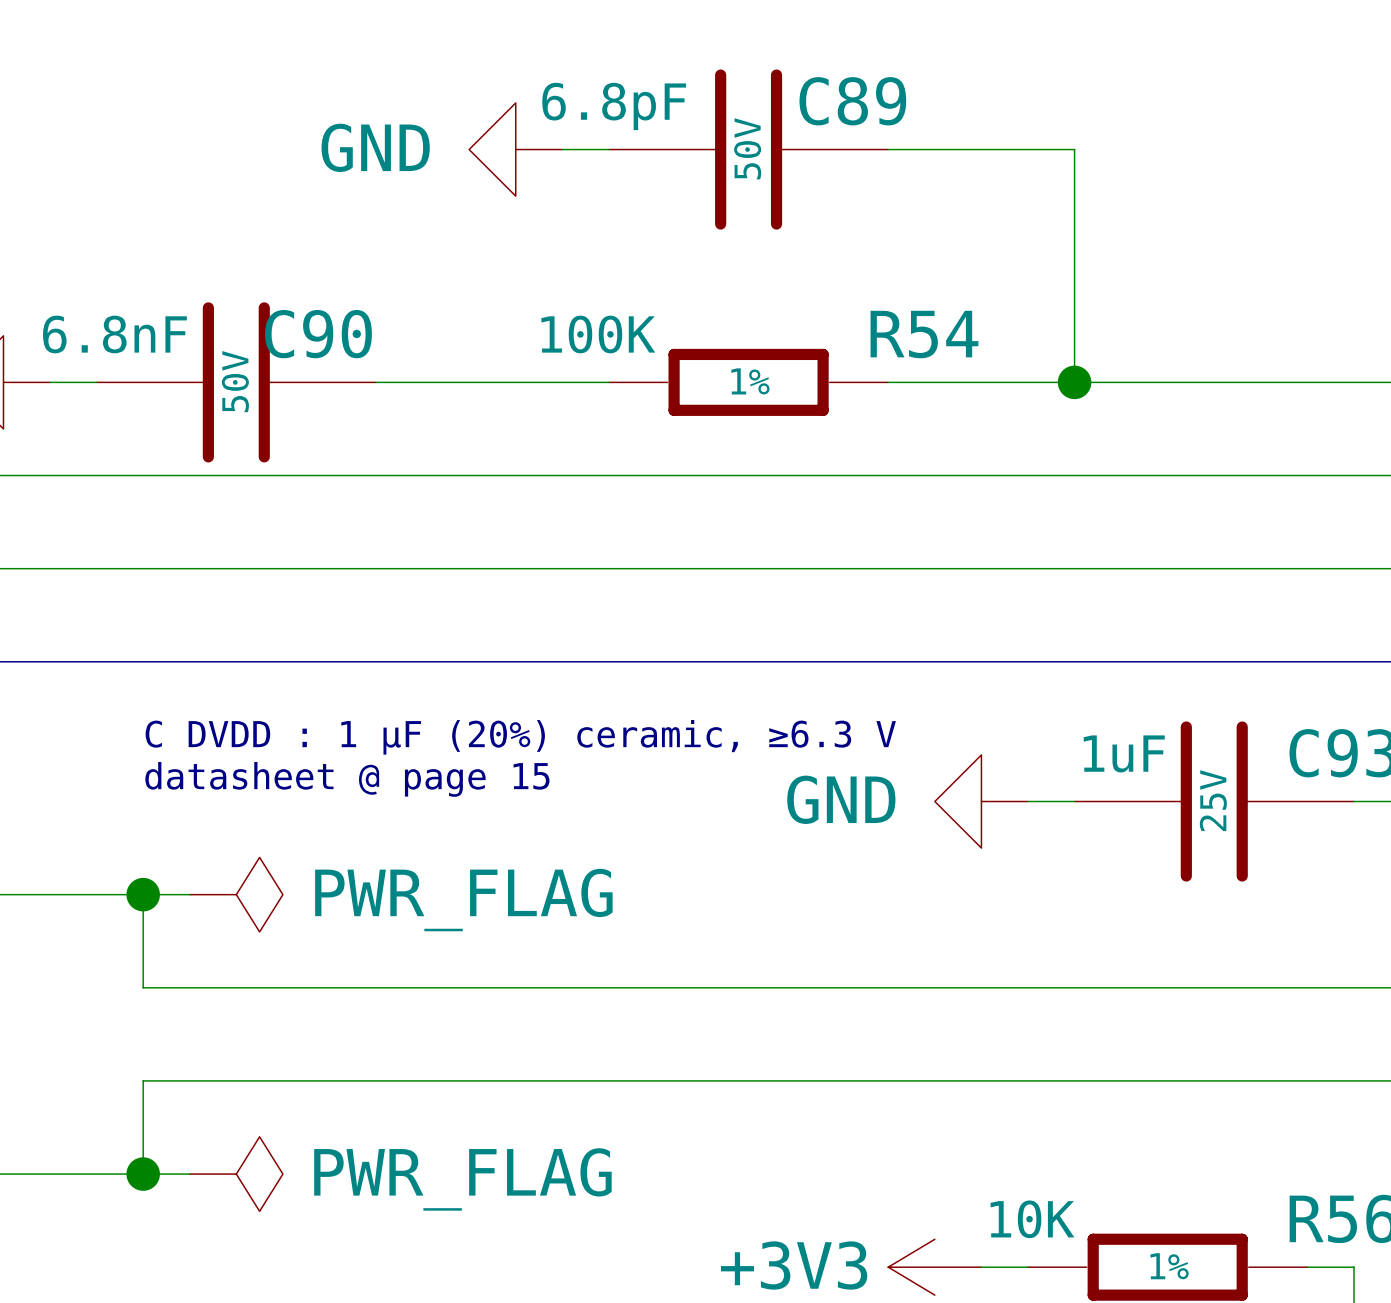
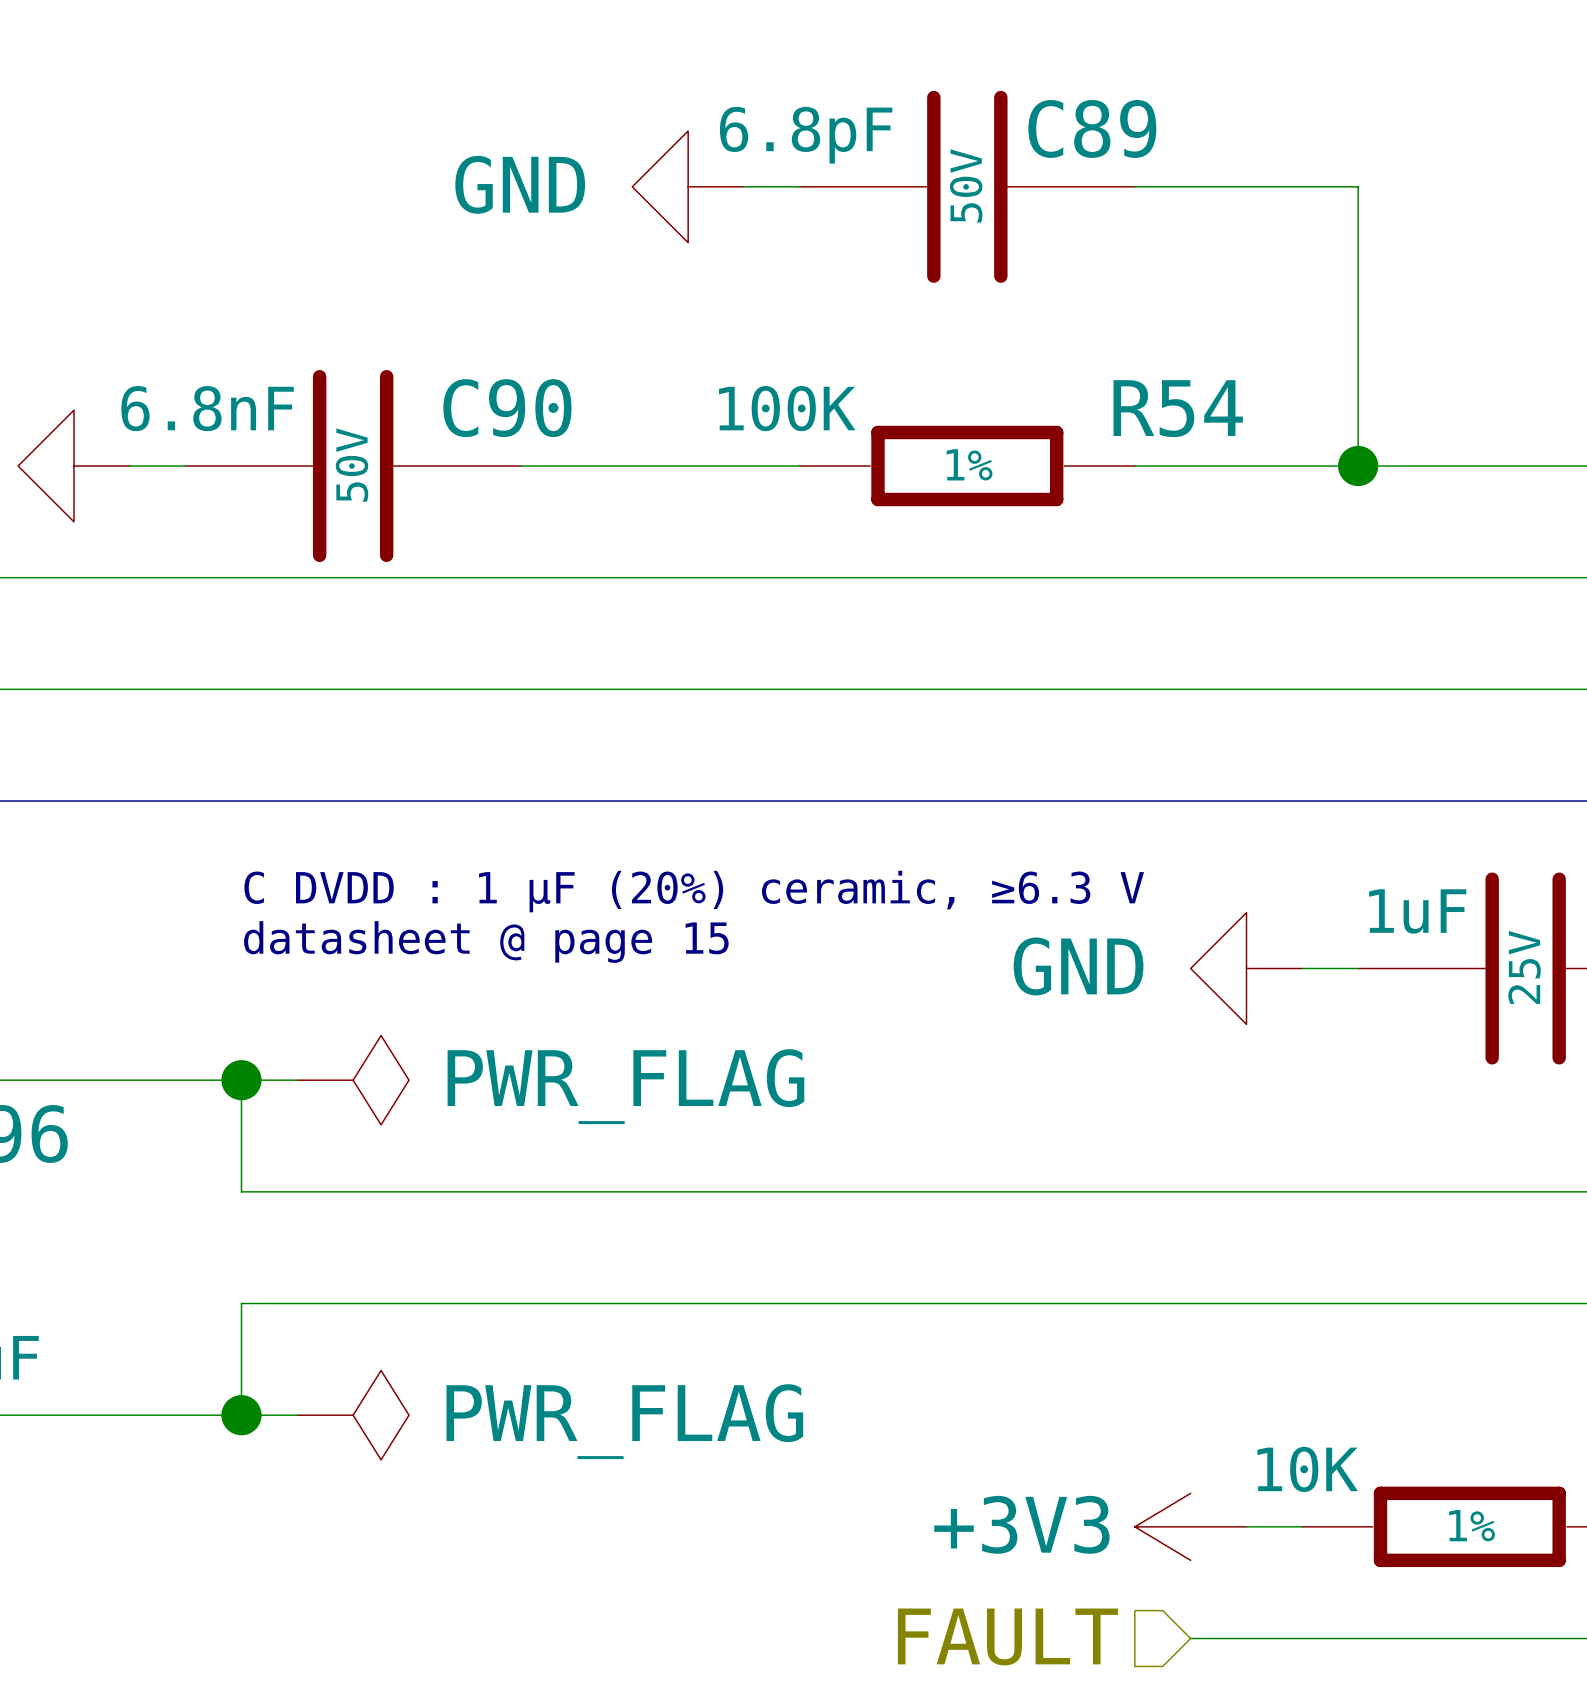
C90 name position: C90 (318, 334) -> C90 (507, 408)

